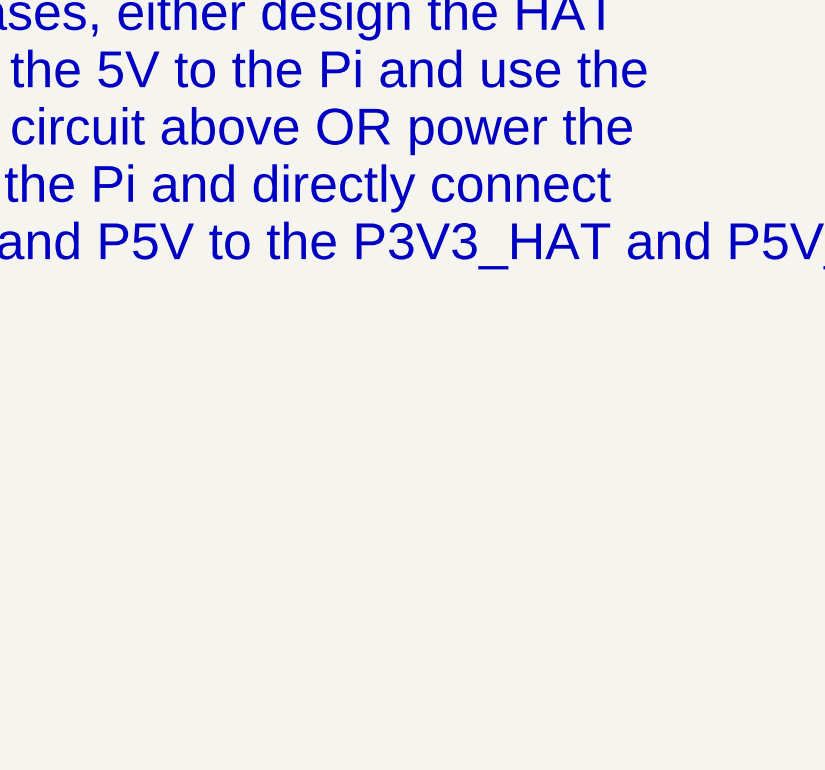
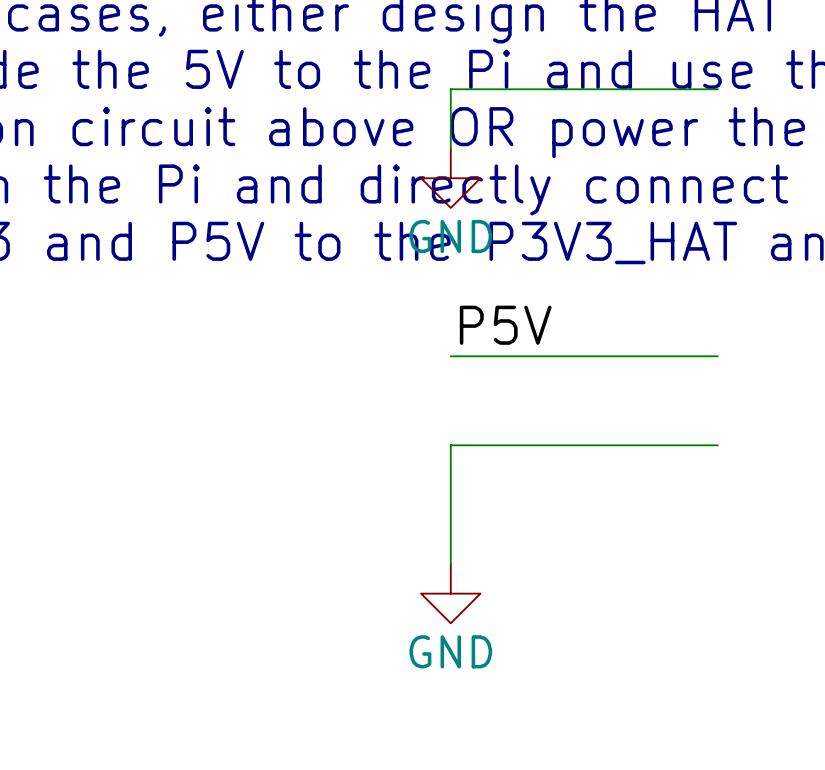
wire: none -> (717, 89) (450, 89) (450, 148)
power symbol: none -> GND (450, 178)
label: none -> P5V (505, 325)
wire: none -> (450, 356) (717, 356)
wire: none -> (717, 445) (450, 445) (450, 563)
power symbol: none -> GND (450, 593)

